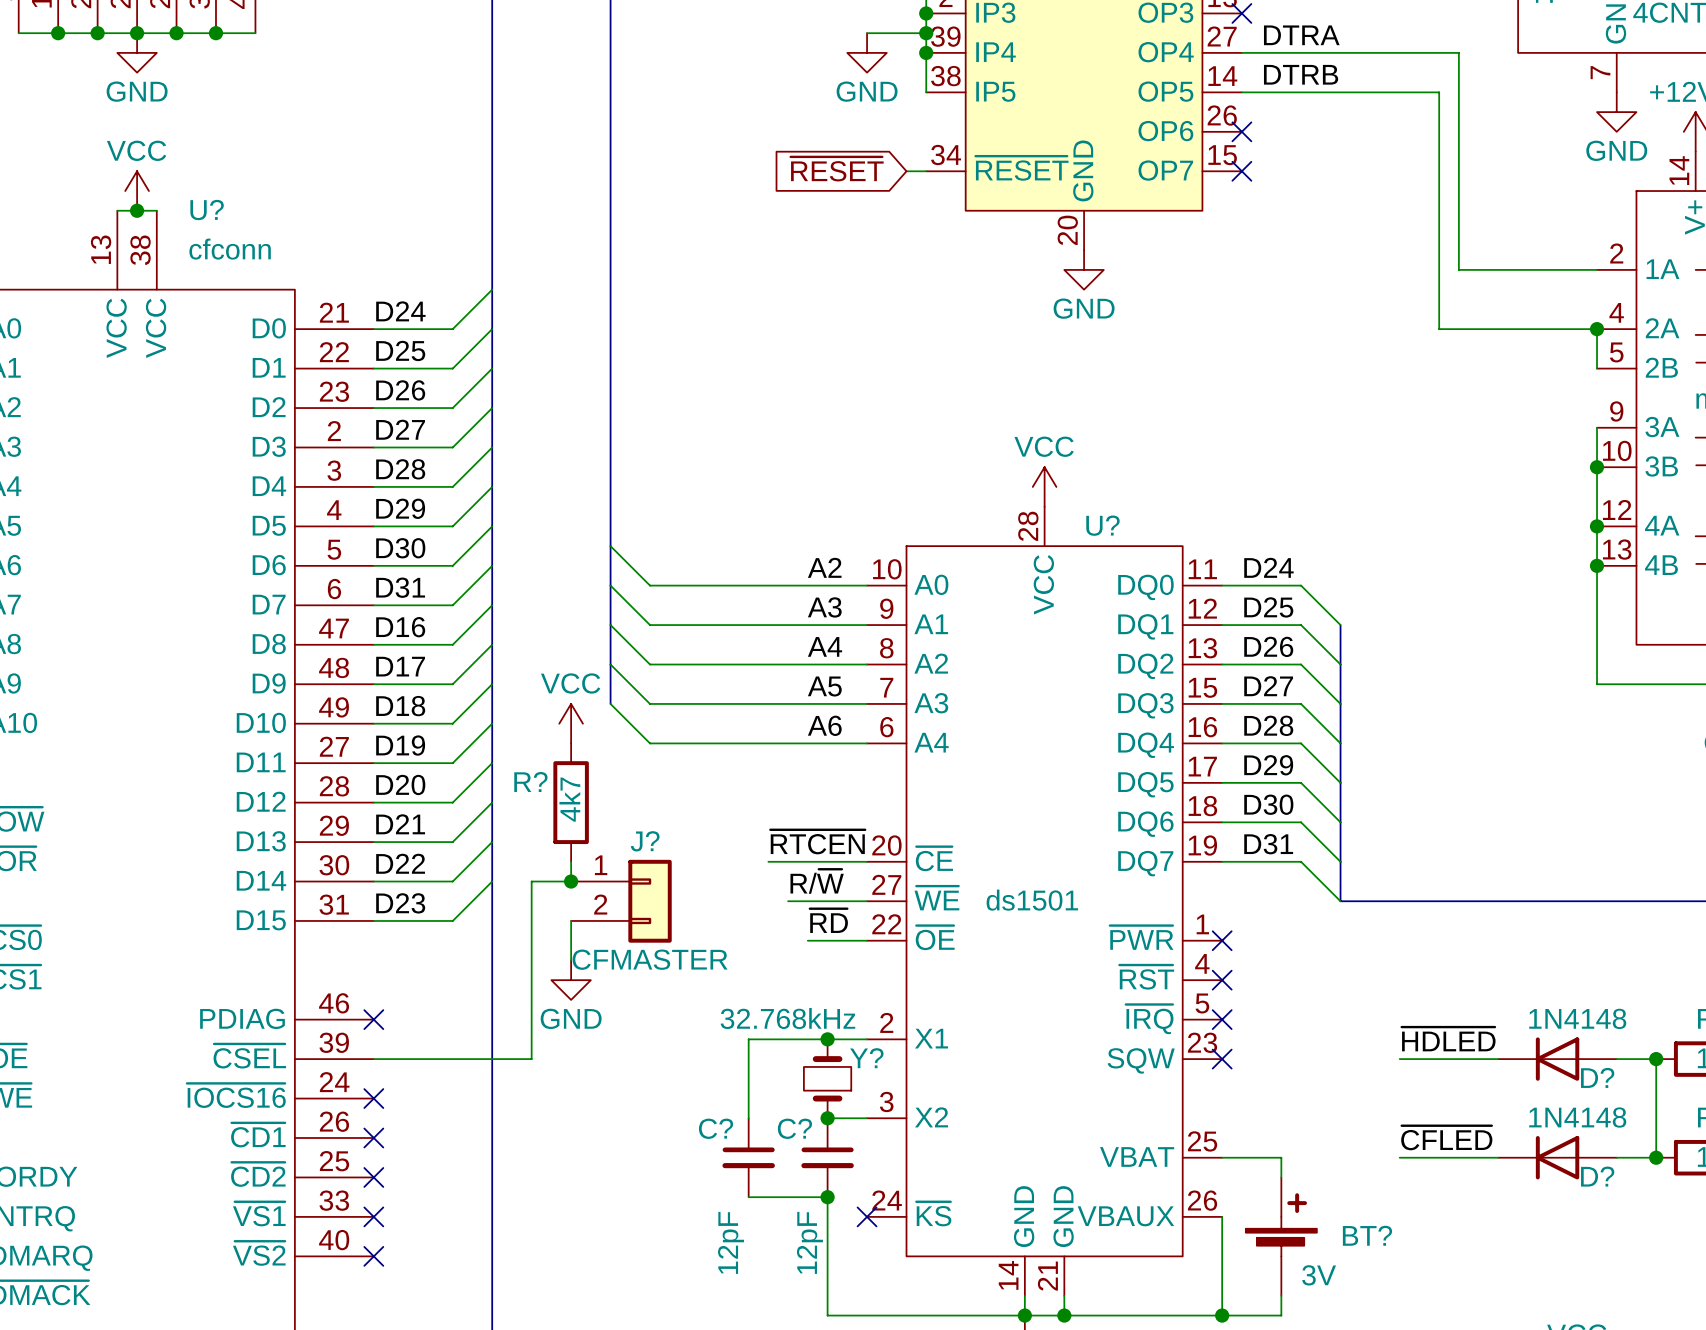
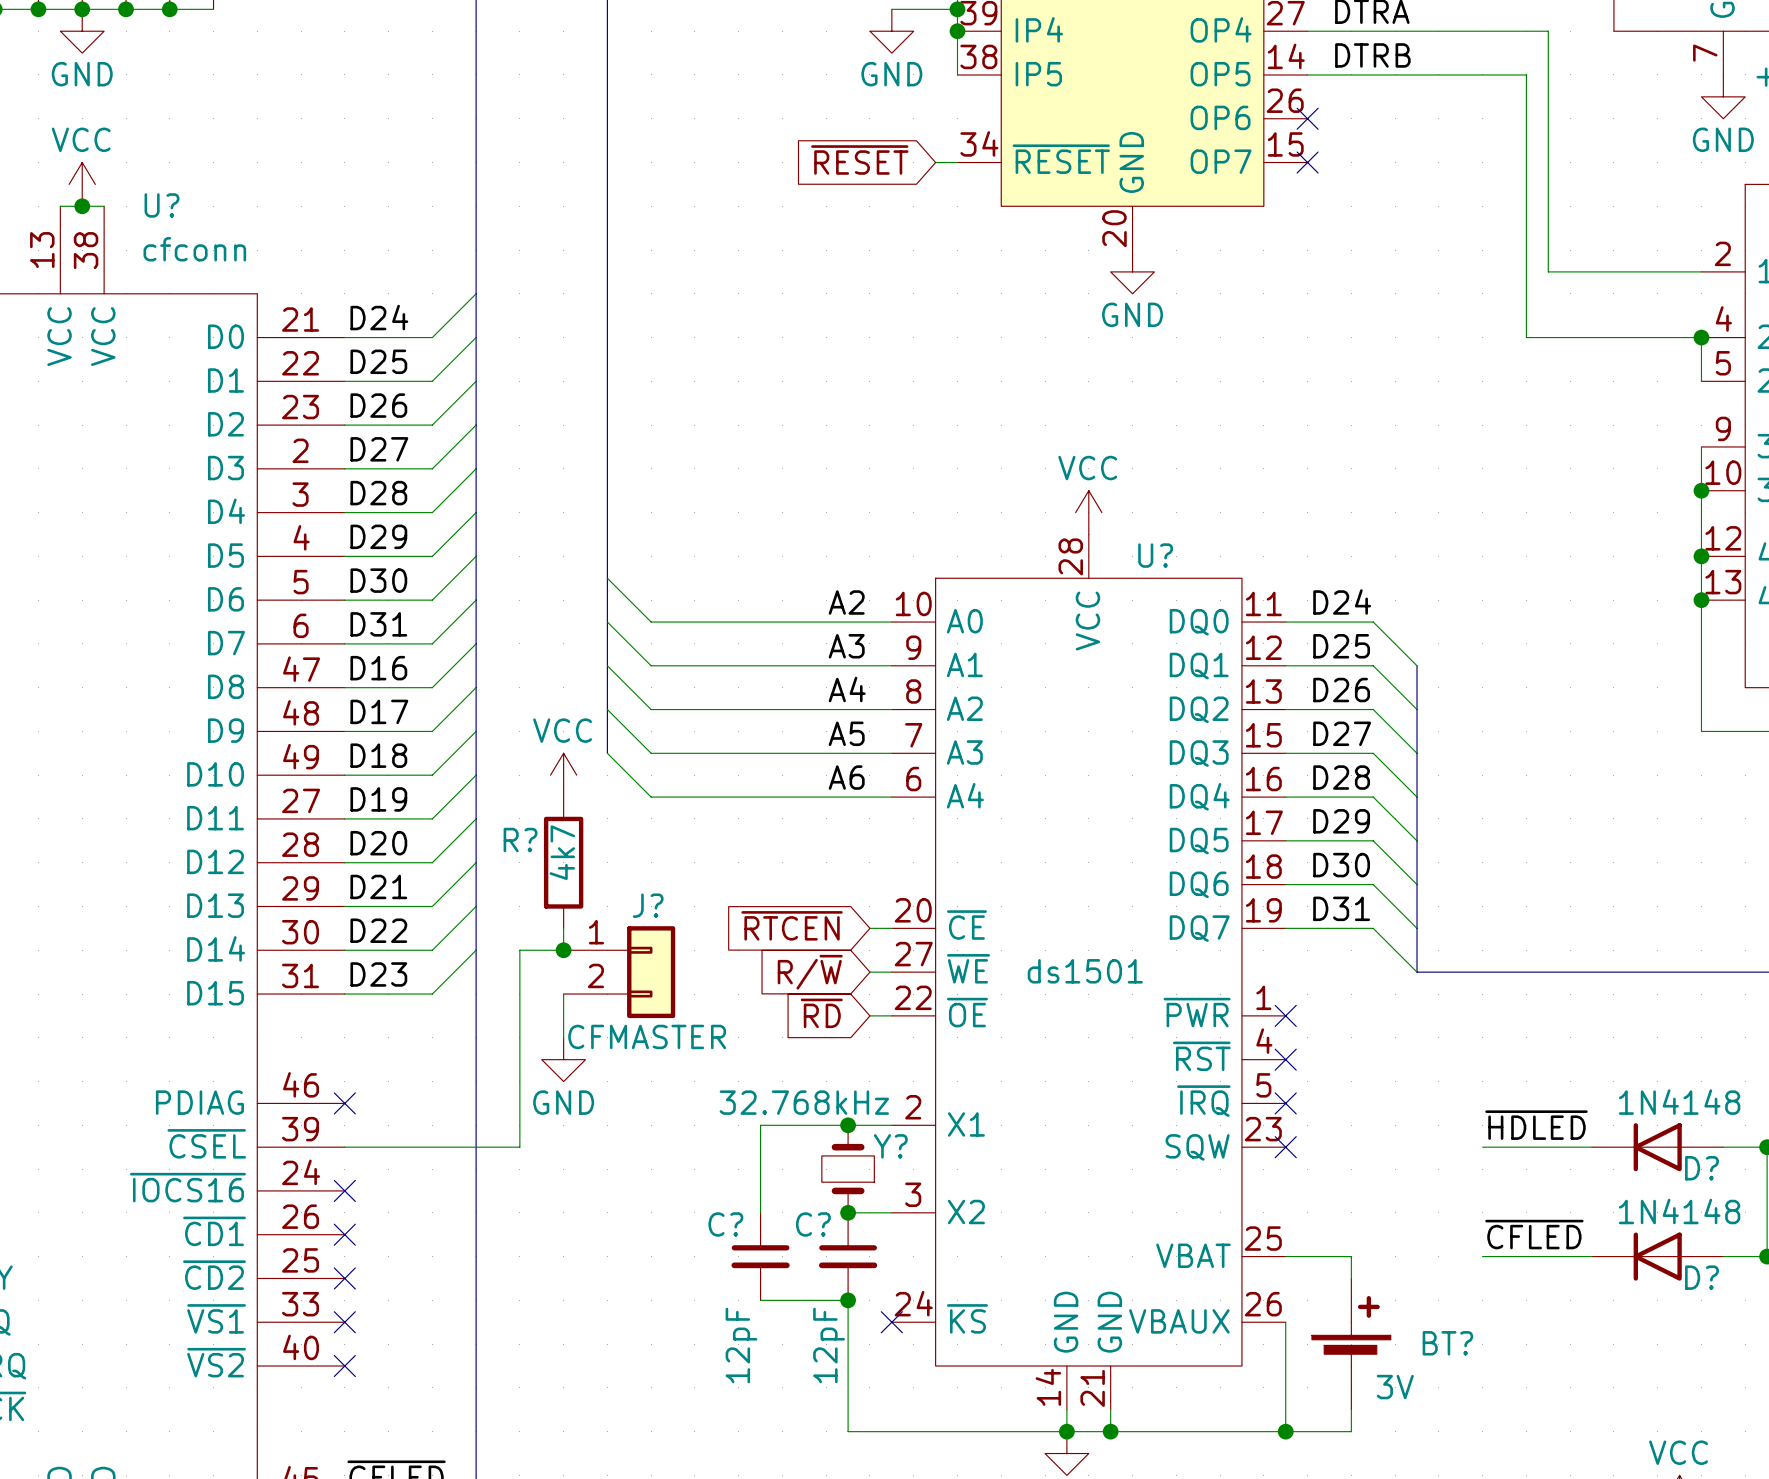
label: ~{RTCEN} (817, 842) -> none
global label: none -> ~{RTCEN} (792, 925)
wire: (768, 861) (847, 861) -> none
label: R/~{W} (817, 881) -> none
global label: none -> R/~{W} (810, 972)
wire: (788, 901) (847, 901) -> none
label: ~{RD} (828, 920) -> none
global label: none -> ~{RD} (821, 1013)
wire: (807, 940) (847, 940) -> none

